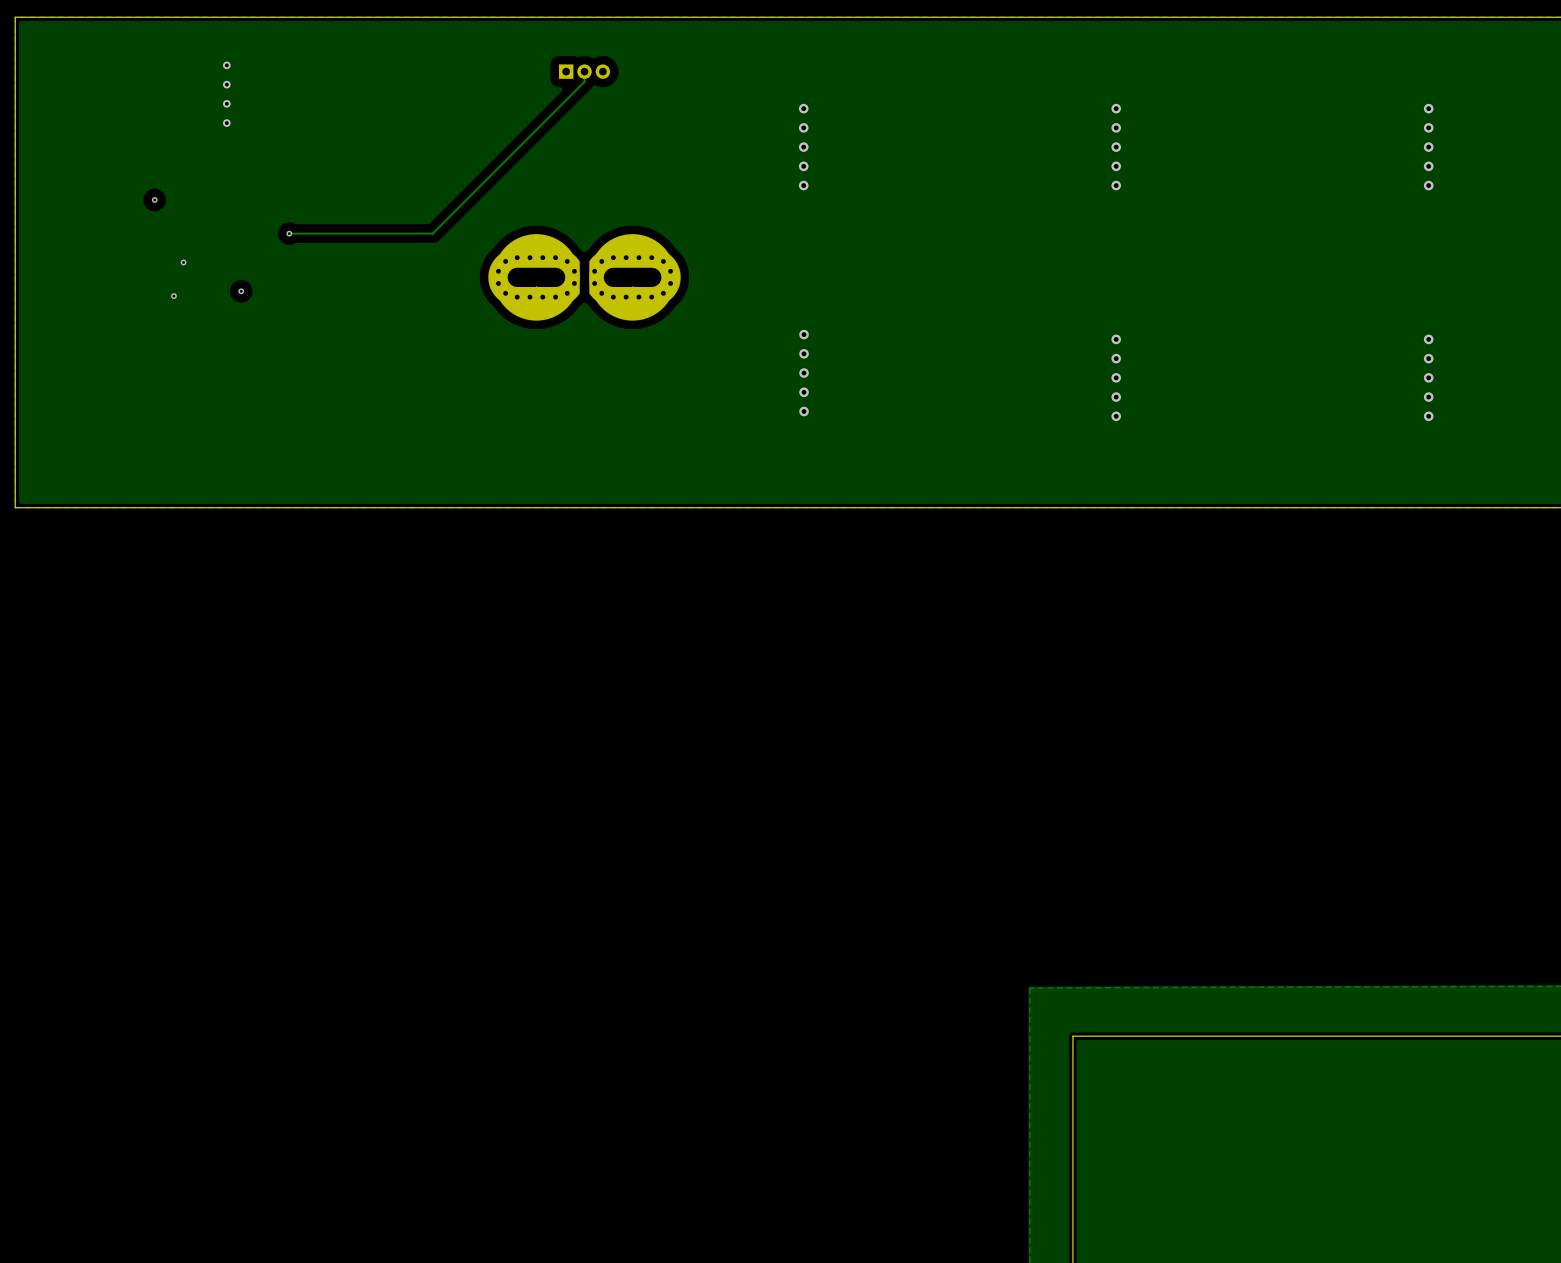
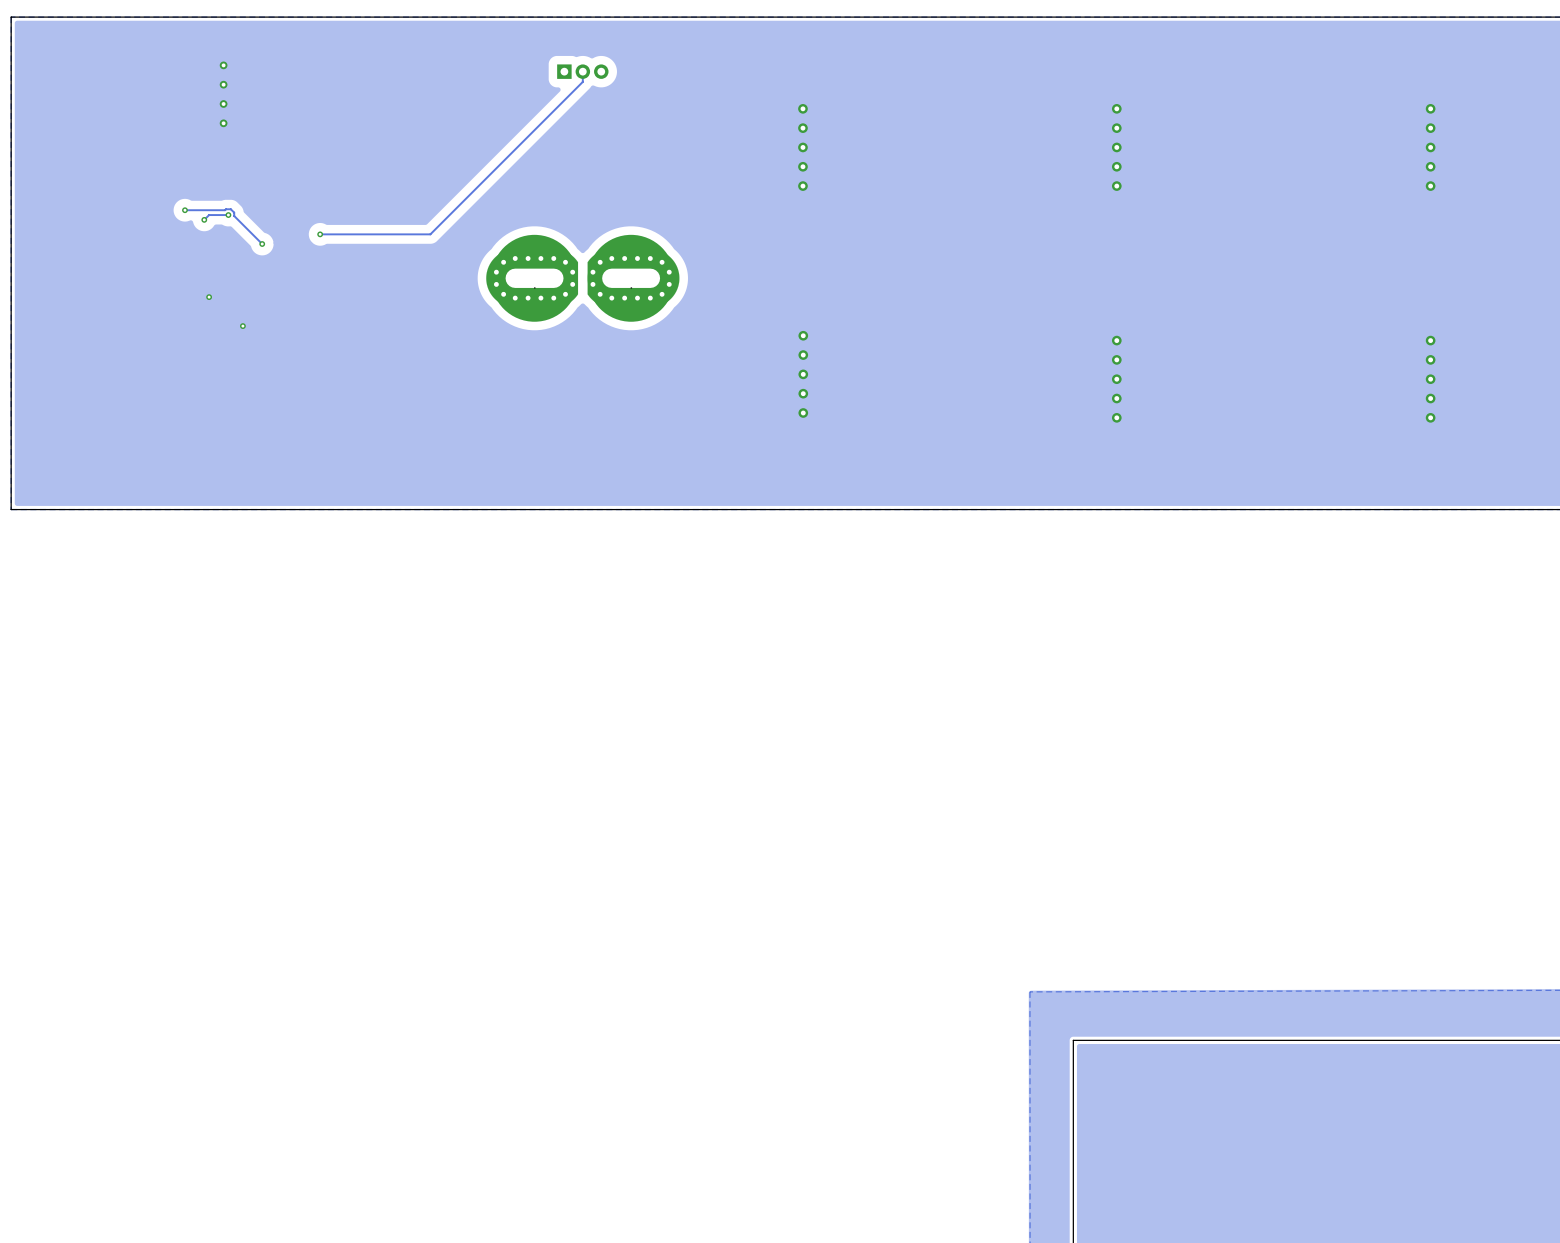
via: (154, 199) -> none
track: none -> (184, 210) (230, 209) (234, 212) (234, 216) (262, 244)
via: none -> (184, 210)
track: none -> (228, 215) (209, 215) (204, 219)
via: none -> (228, 215)
via: none -> (204, 219)
via: (289, 233) -> none
track: (322, 233) (289, 233) -> none
via: none -> (320, 234)
via: none -> (262, 244)
via: (183, 262) -> none
via: (241, 291) -> none
via: (173, 296) -> none
via: none -> (209, 297)
via: none -> (242, 326)

